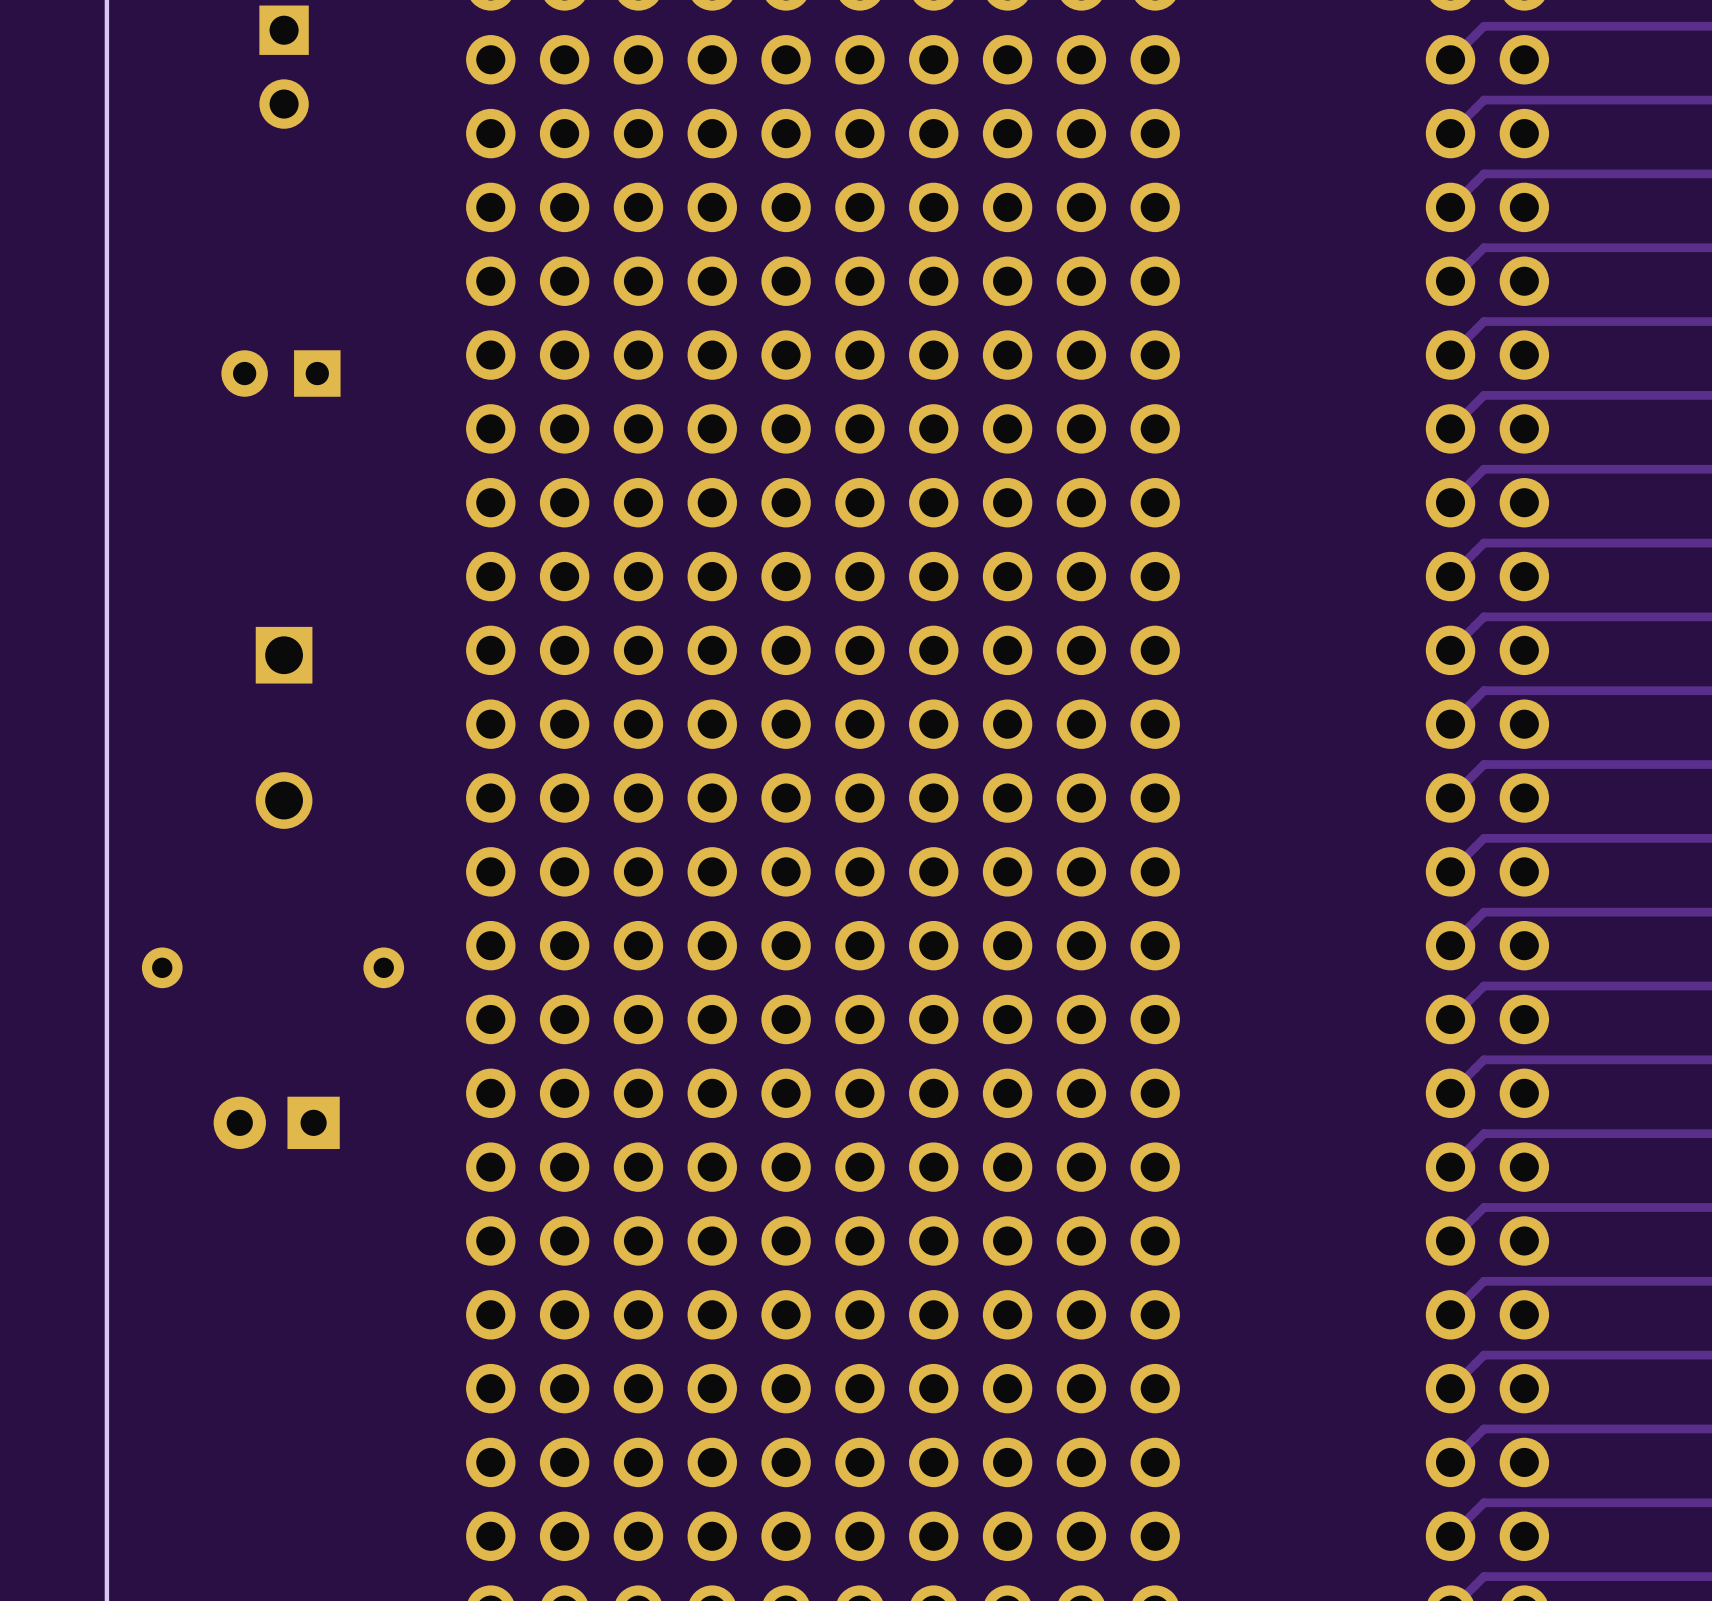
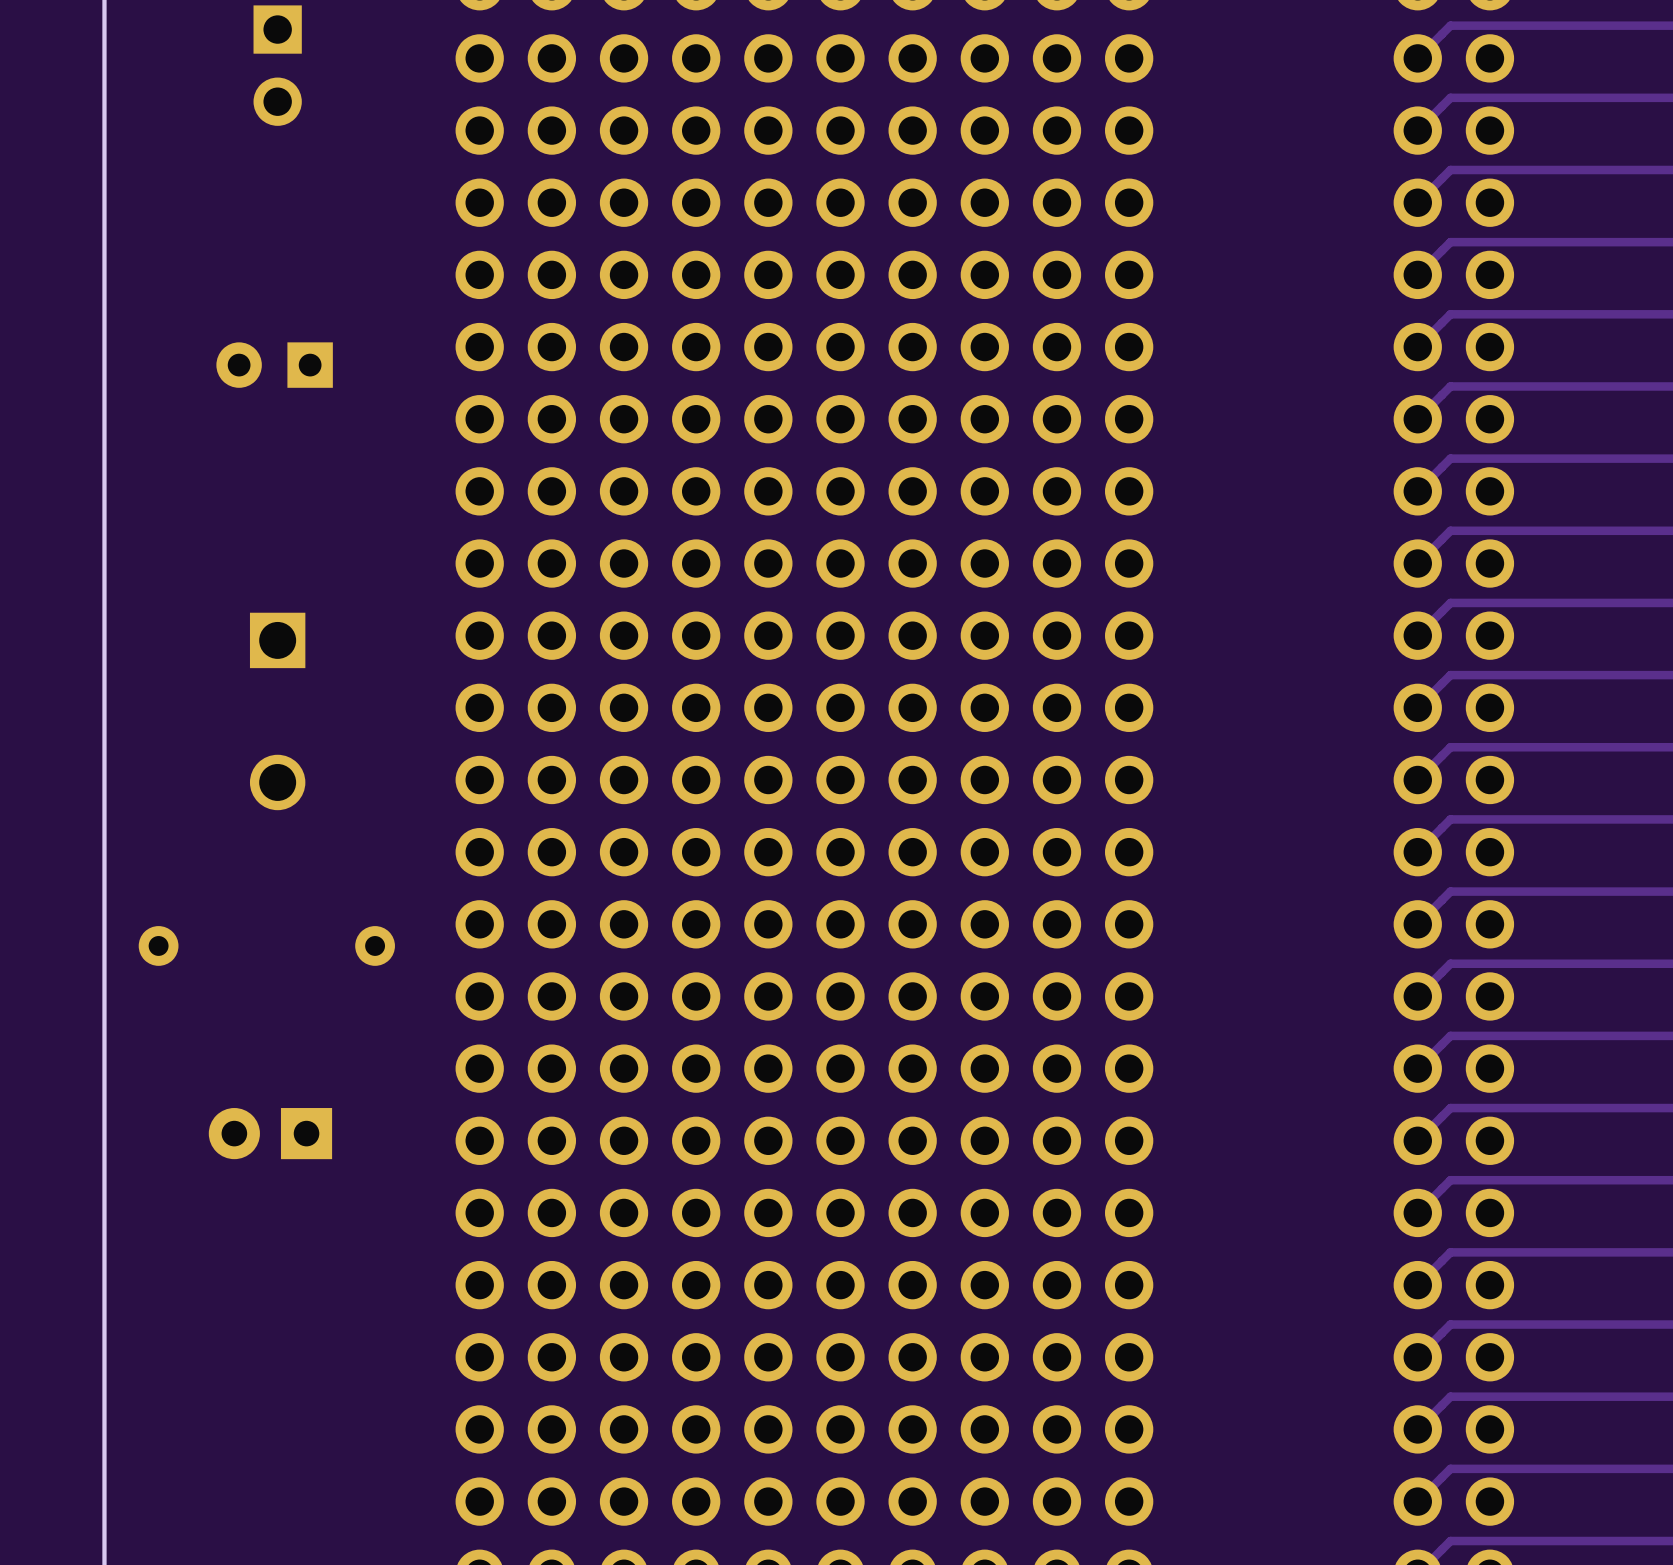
part position: (276, 1122) -> (270, 1133)

